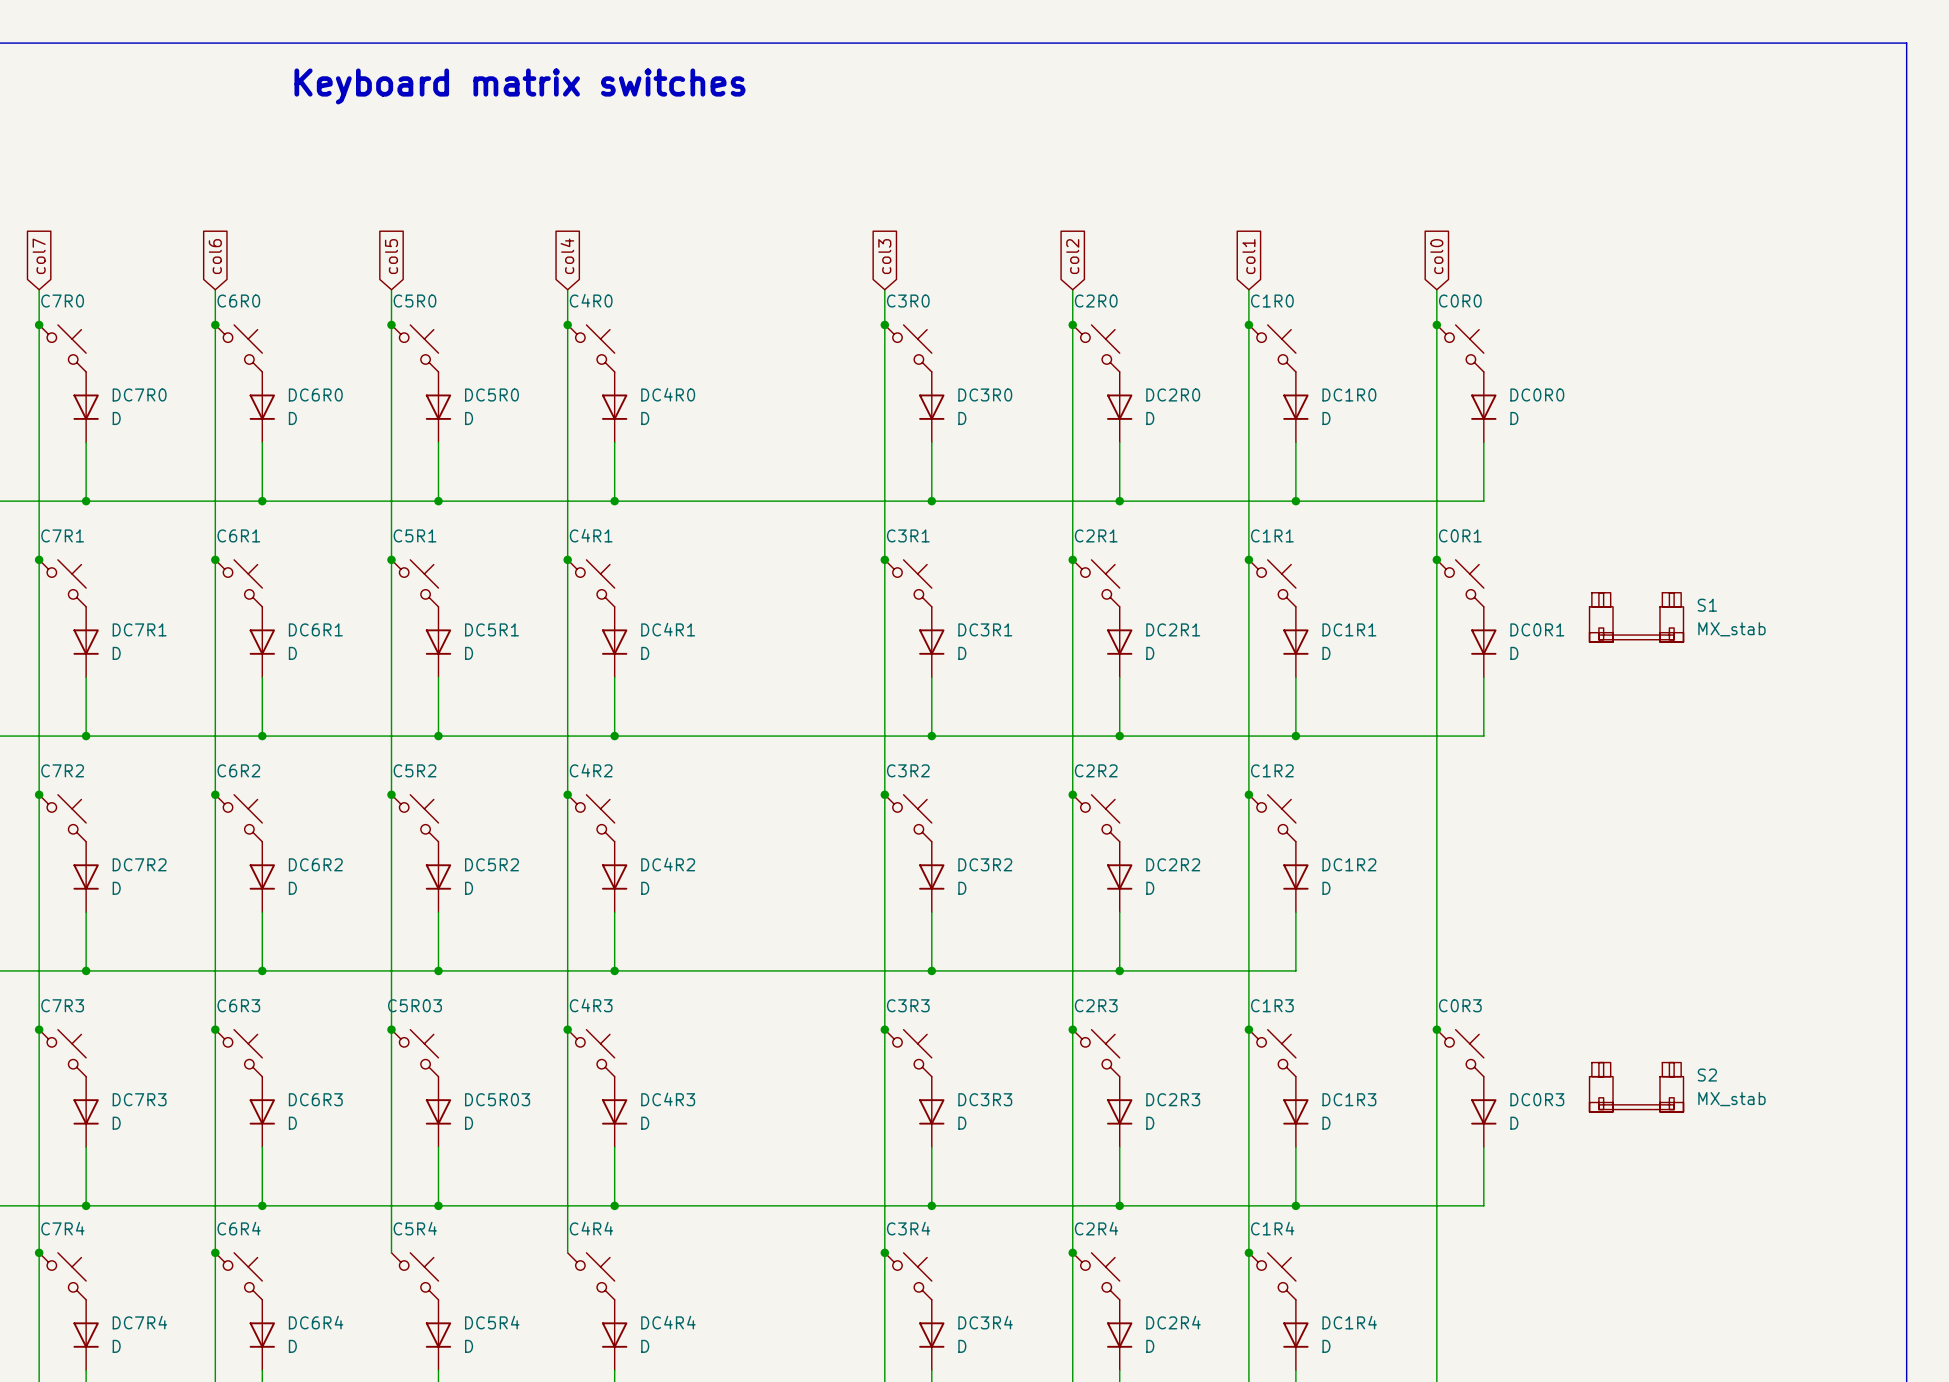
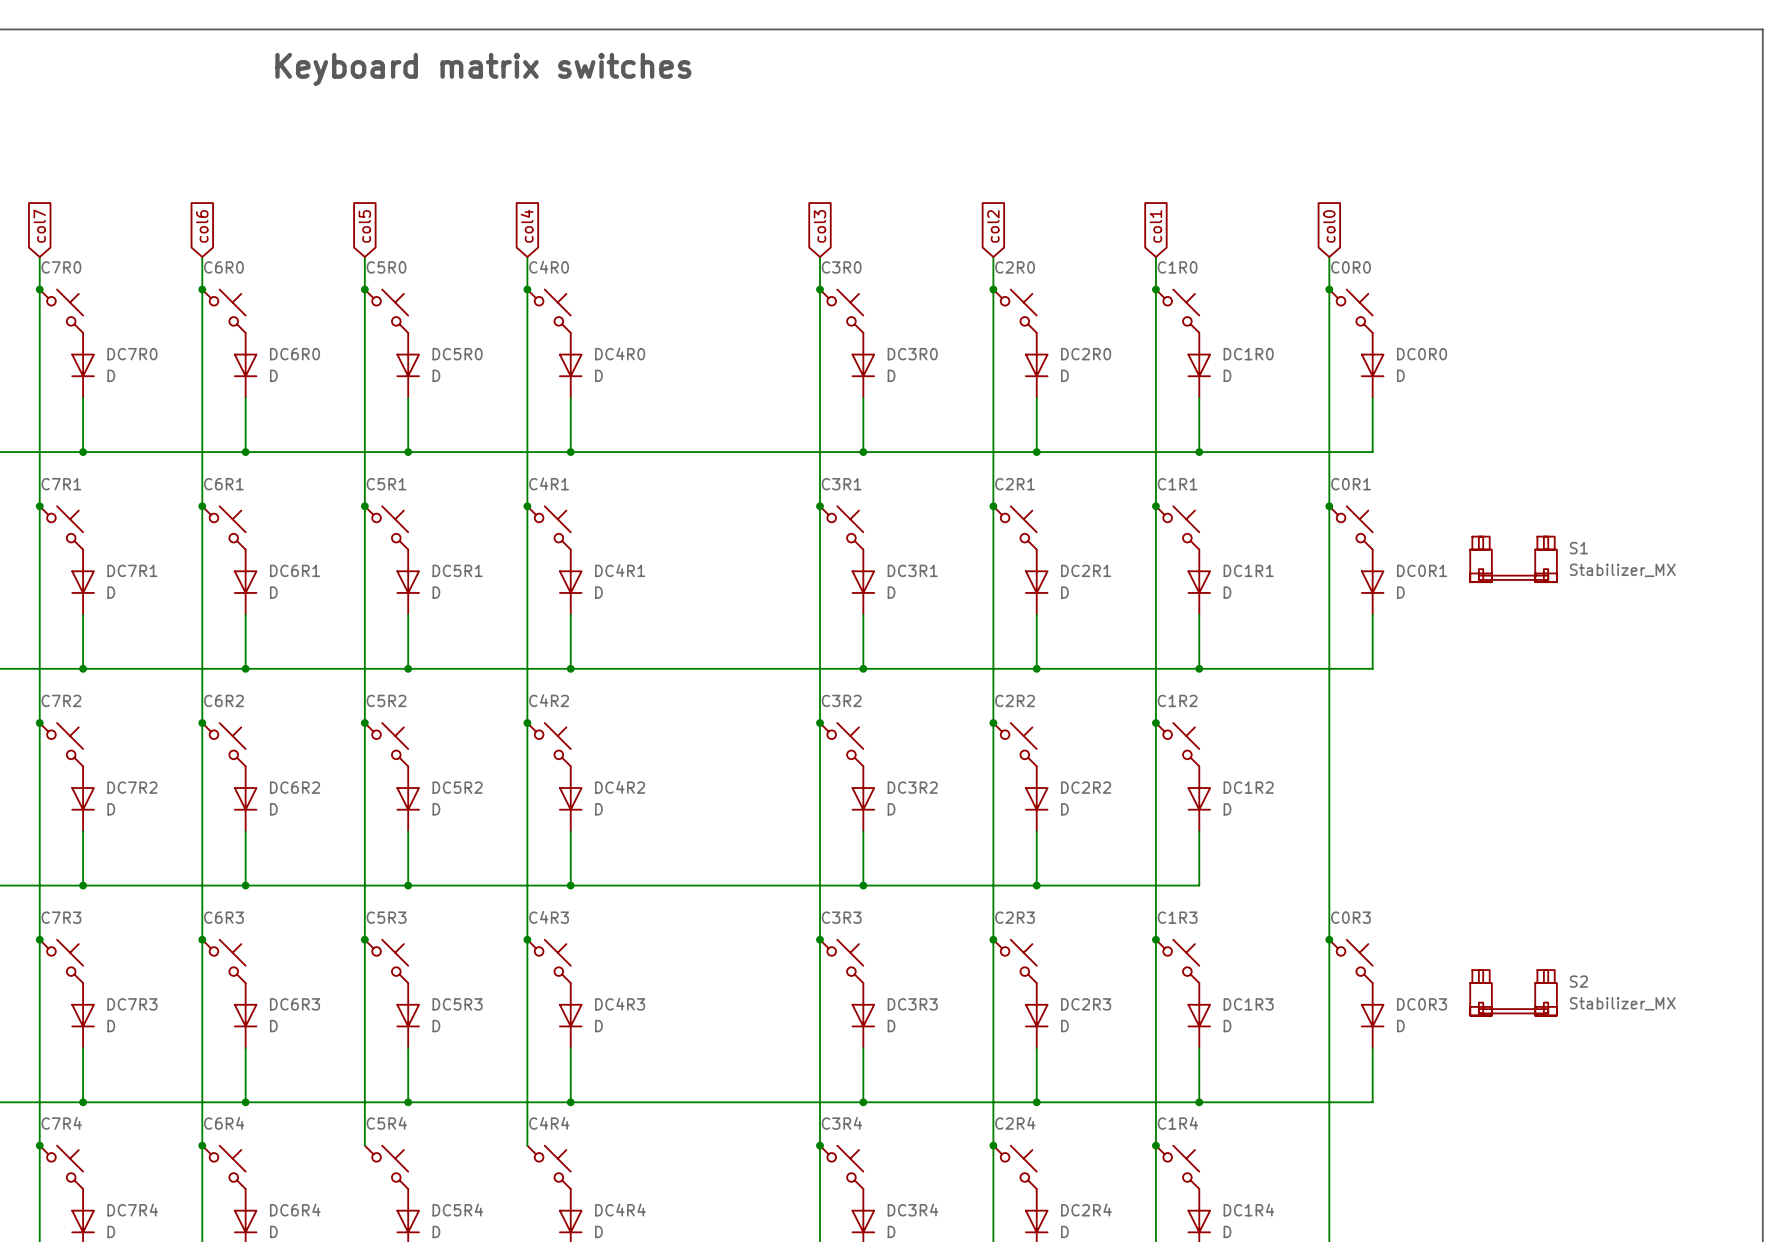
S1 value: MX_stab (1731, 629) -> Stabilizer_MX (1622, 570)
C5R03 name: C5R03 (414, 1005) -> C5R3 (386, 917)
DC5R03 name: DC5R03 (497, 1099) -> DC5R3 (457, 1004)
S2 value: MX_stab (1731, 1099) -> Stabilizer_MX (1622, 1003)

